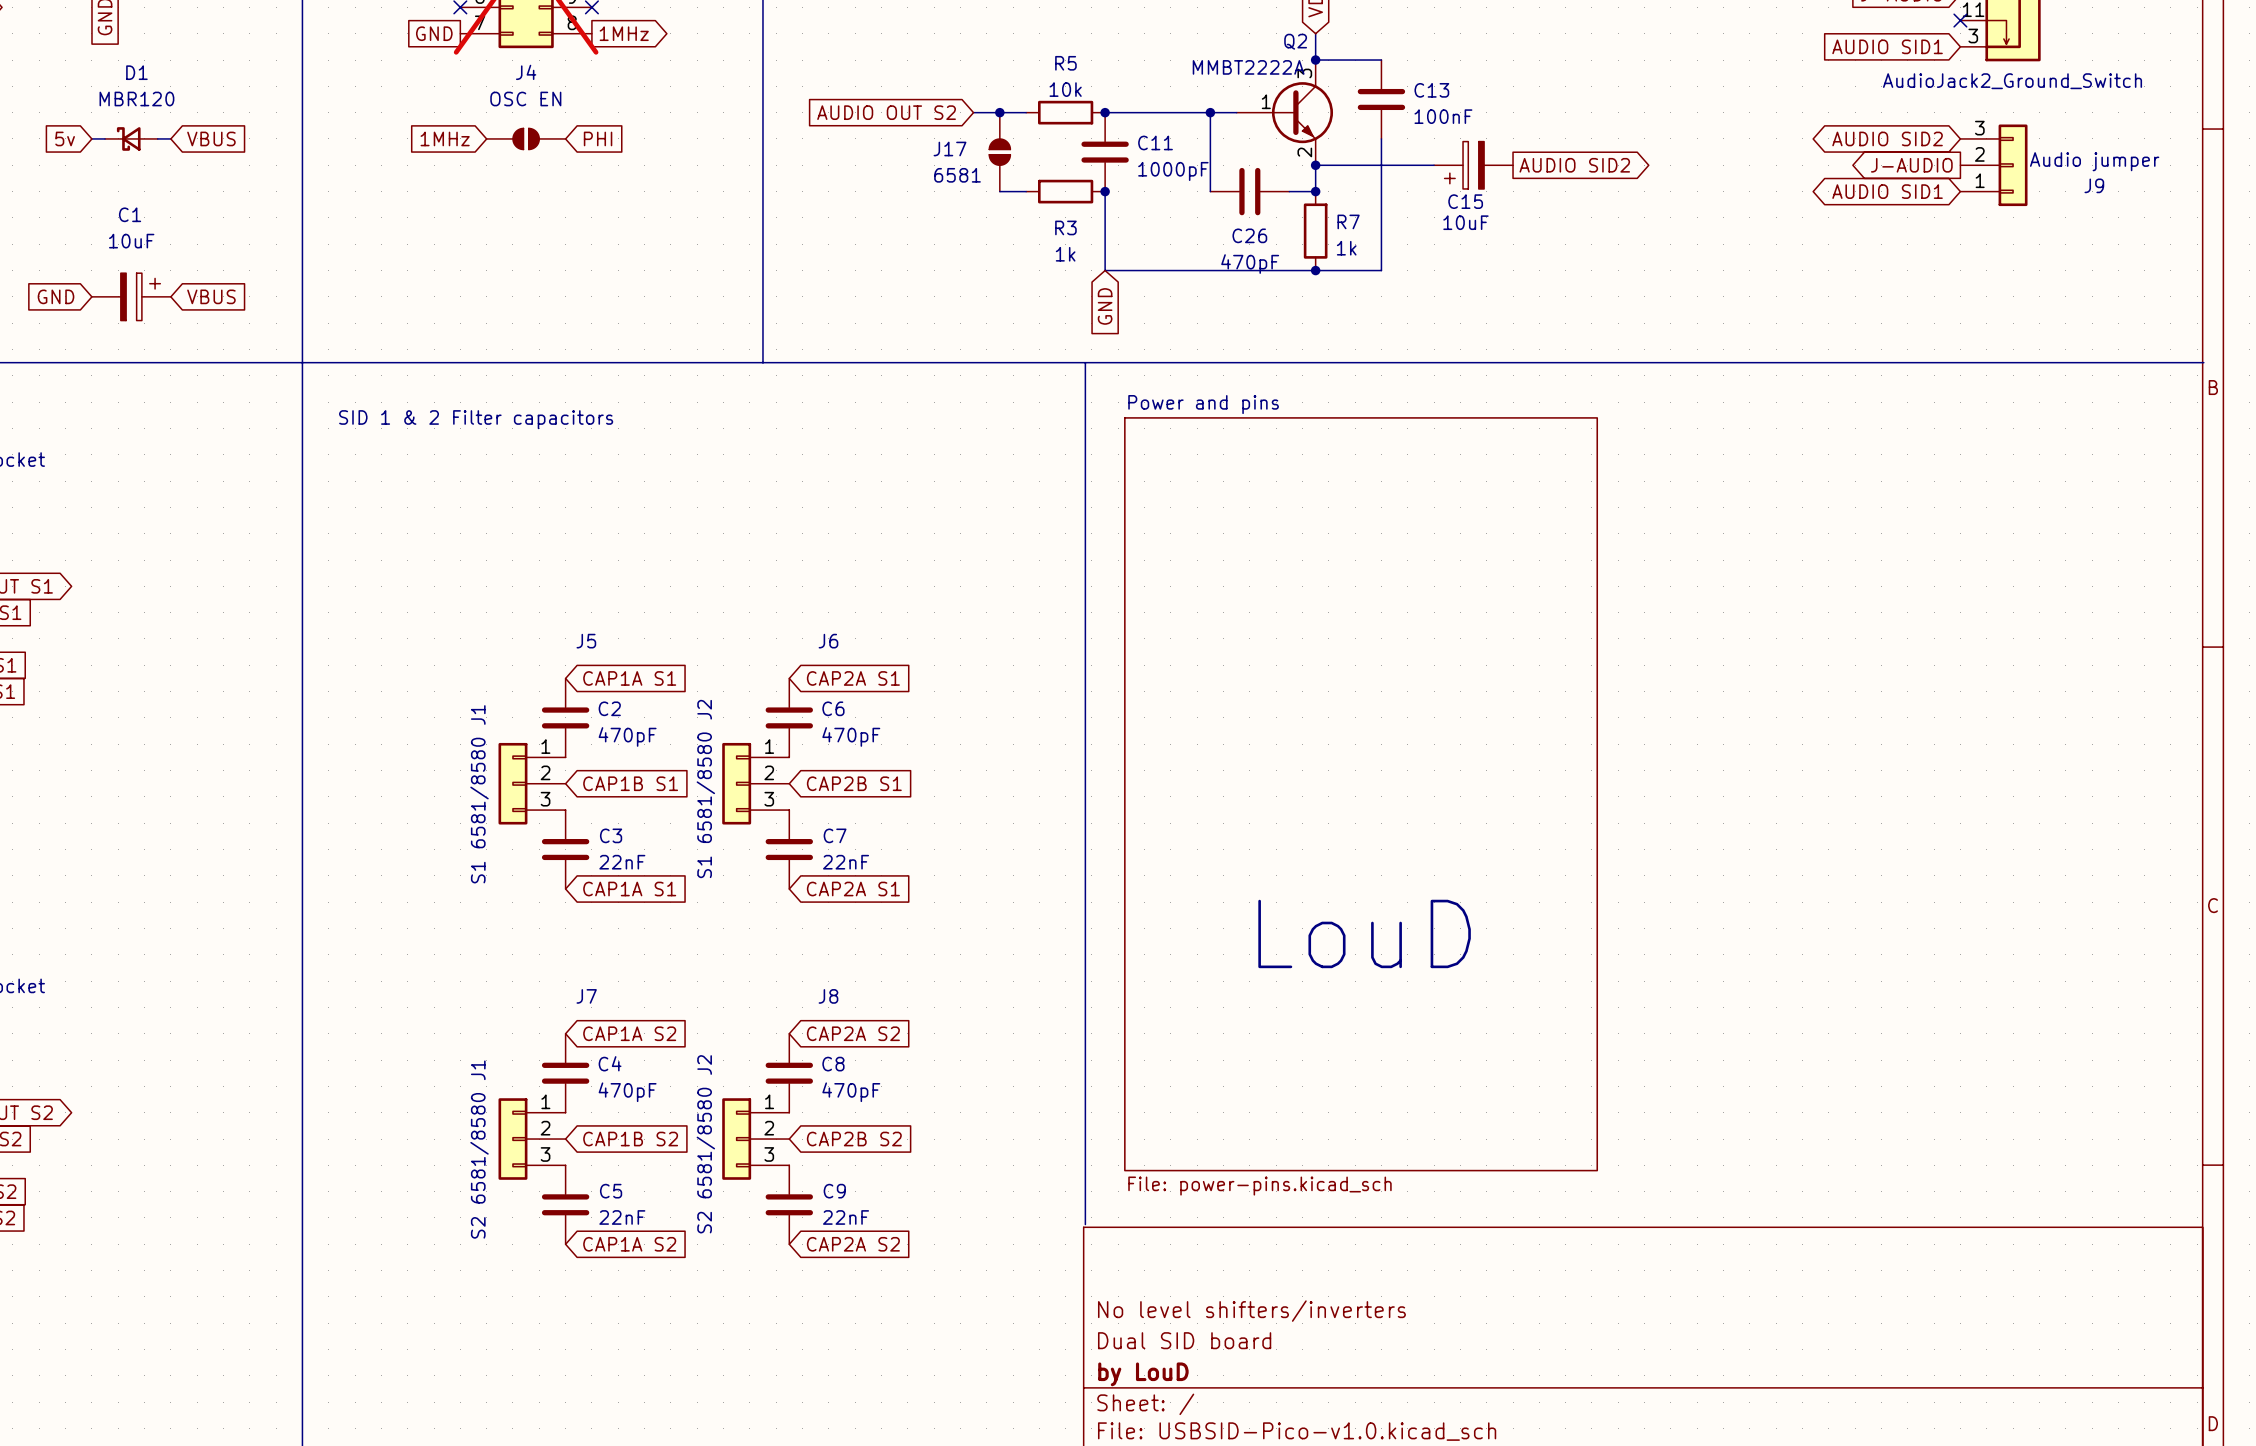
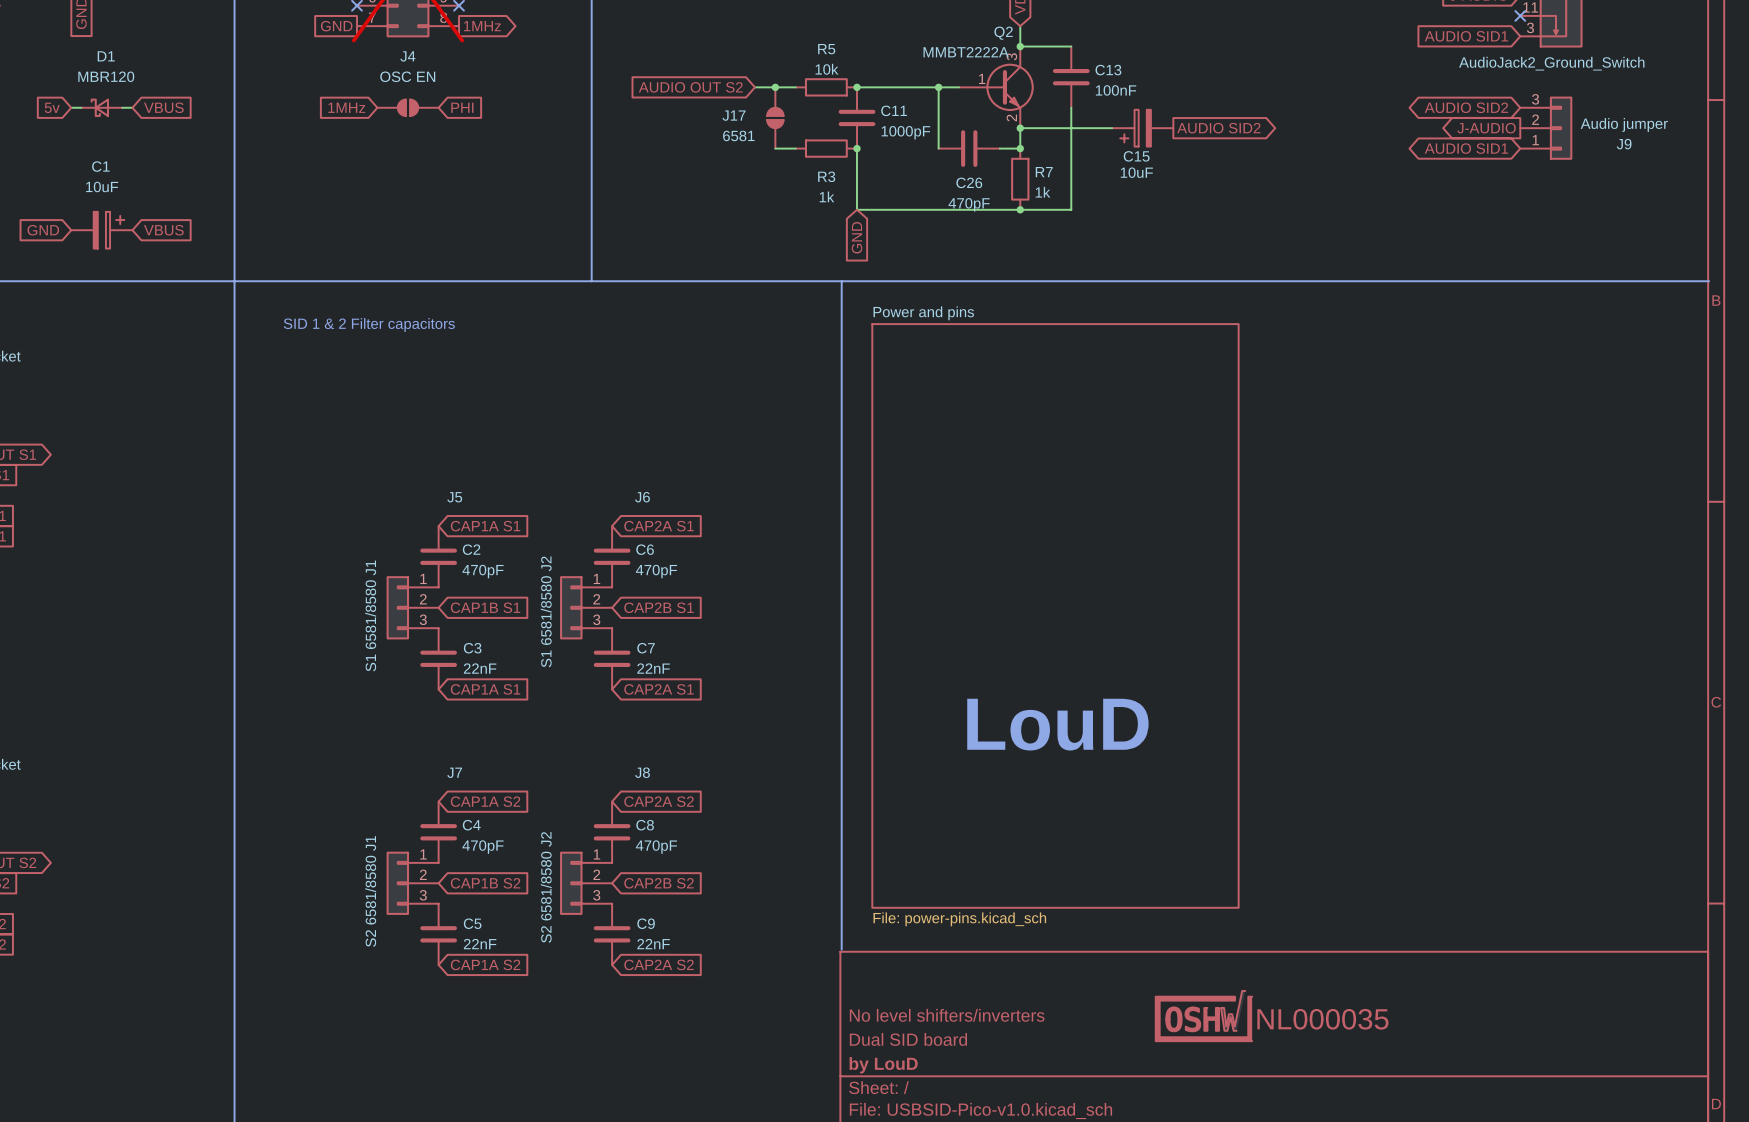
part: none -> (1203, 1016)

